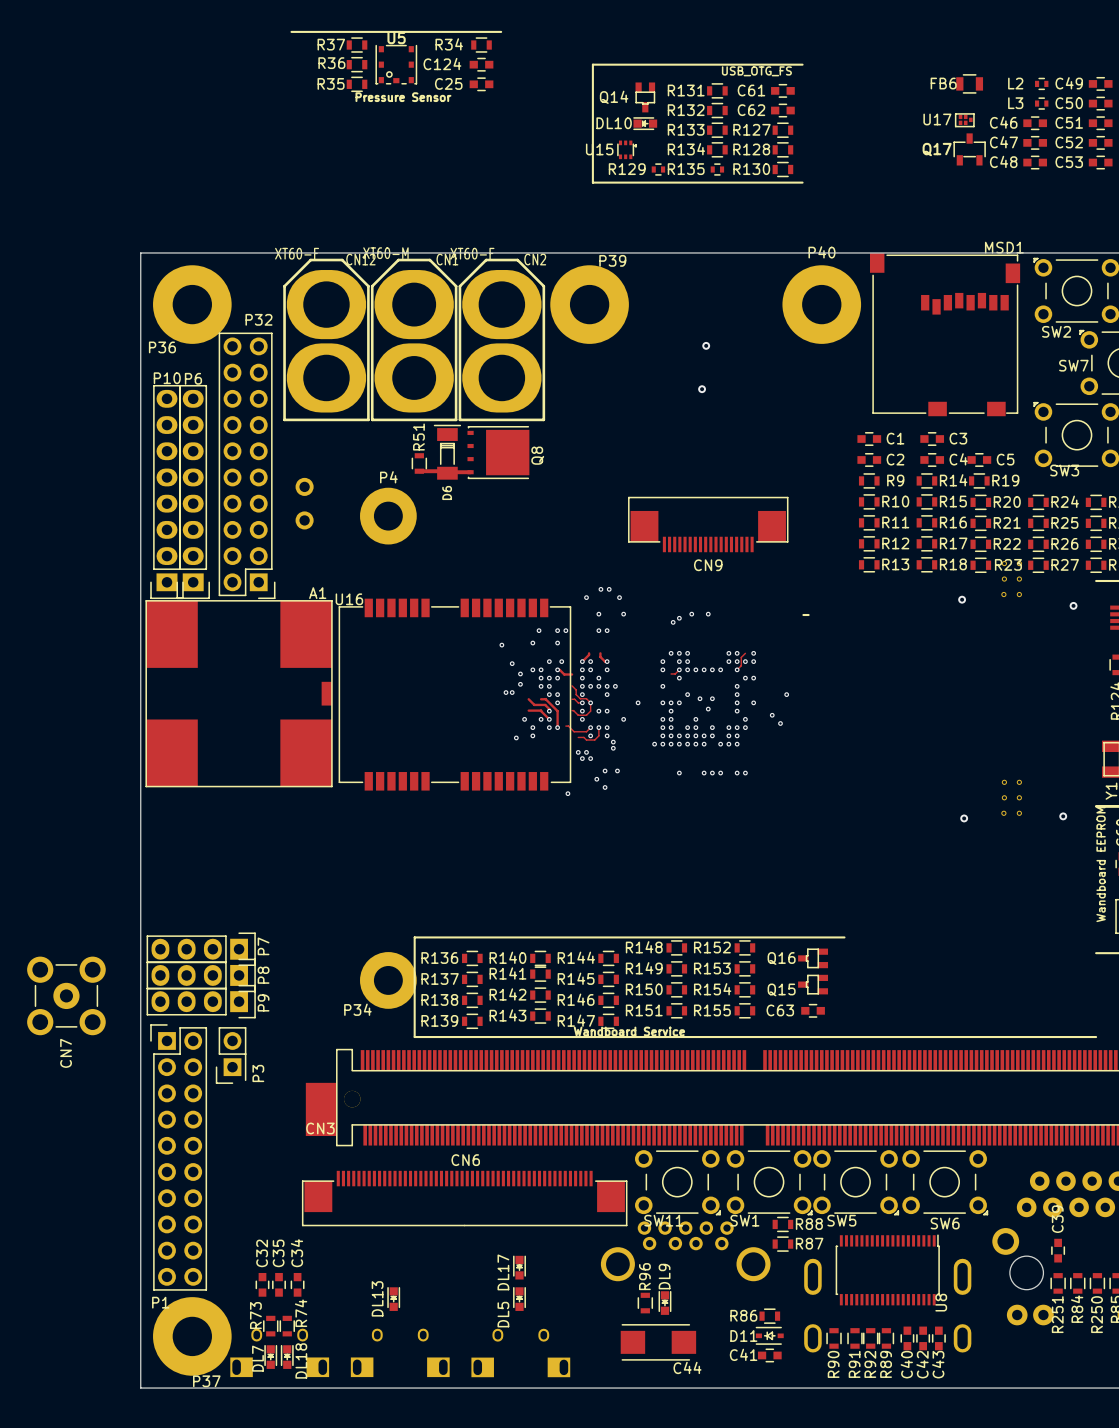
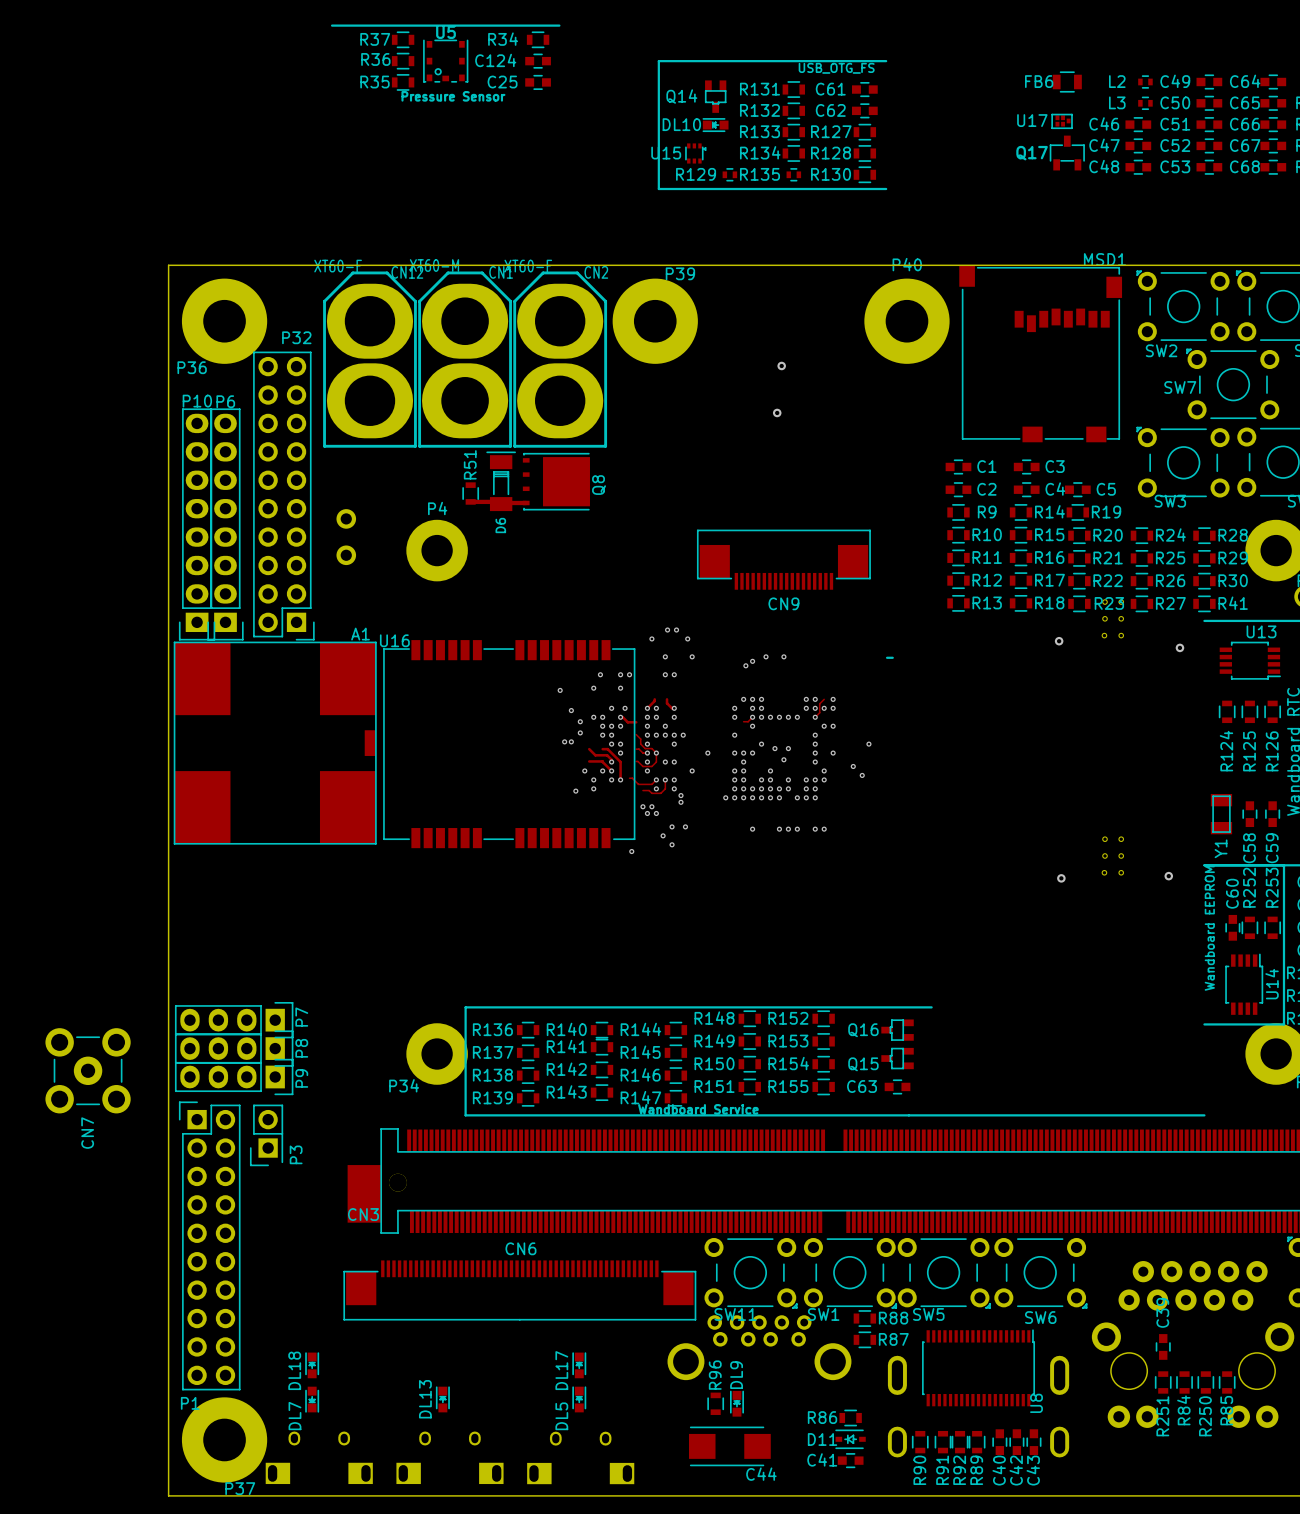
C32: (262, 1284) -> none
C35: (279, 1284) -> none
C34: (297, 1284) -> none
R73: (270, 1326) -> none
R74: (287, 1326) -> none
DL7 rotation: 0° (270, 1356) -> 180° (312, 1399)
DL7 position: (270, 1356) -> (312, 1399)
DL18 position: (287, 1356) -> (312, 1365)
DL18 name position: DL18 (301, 1360) -> DL18 (294, 1370)

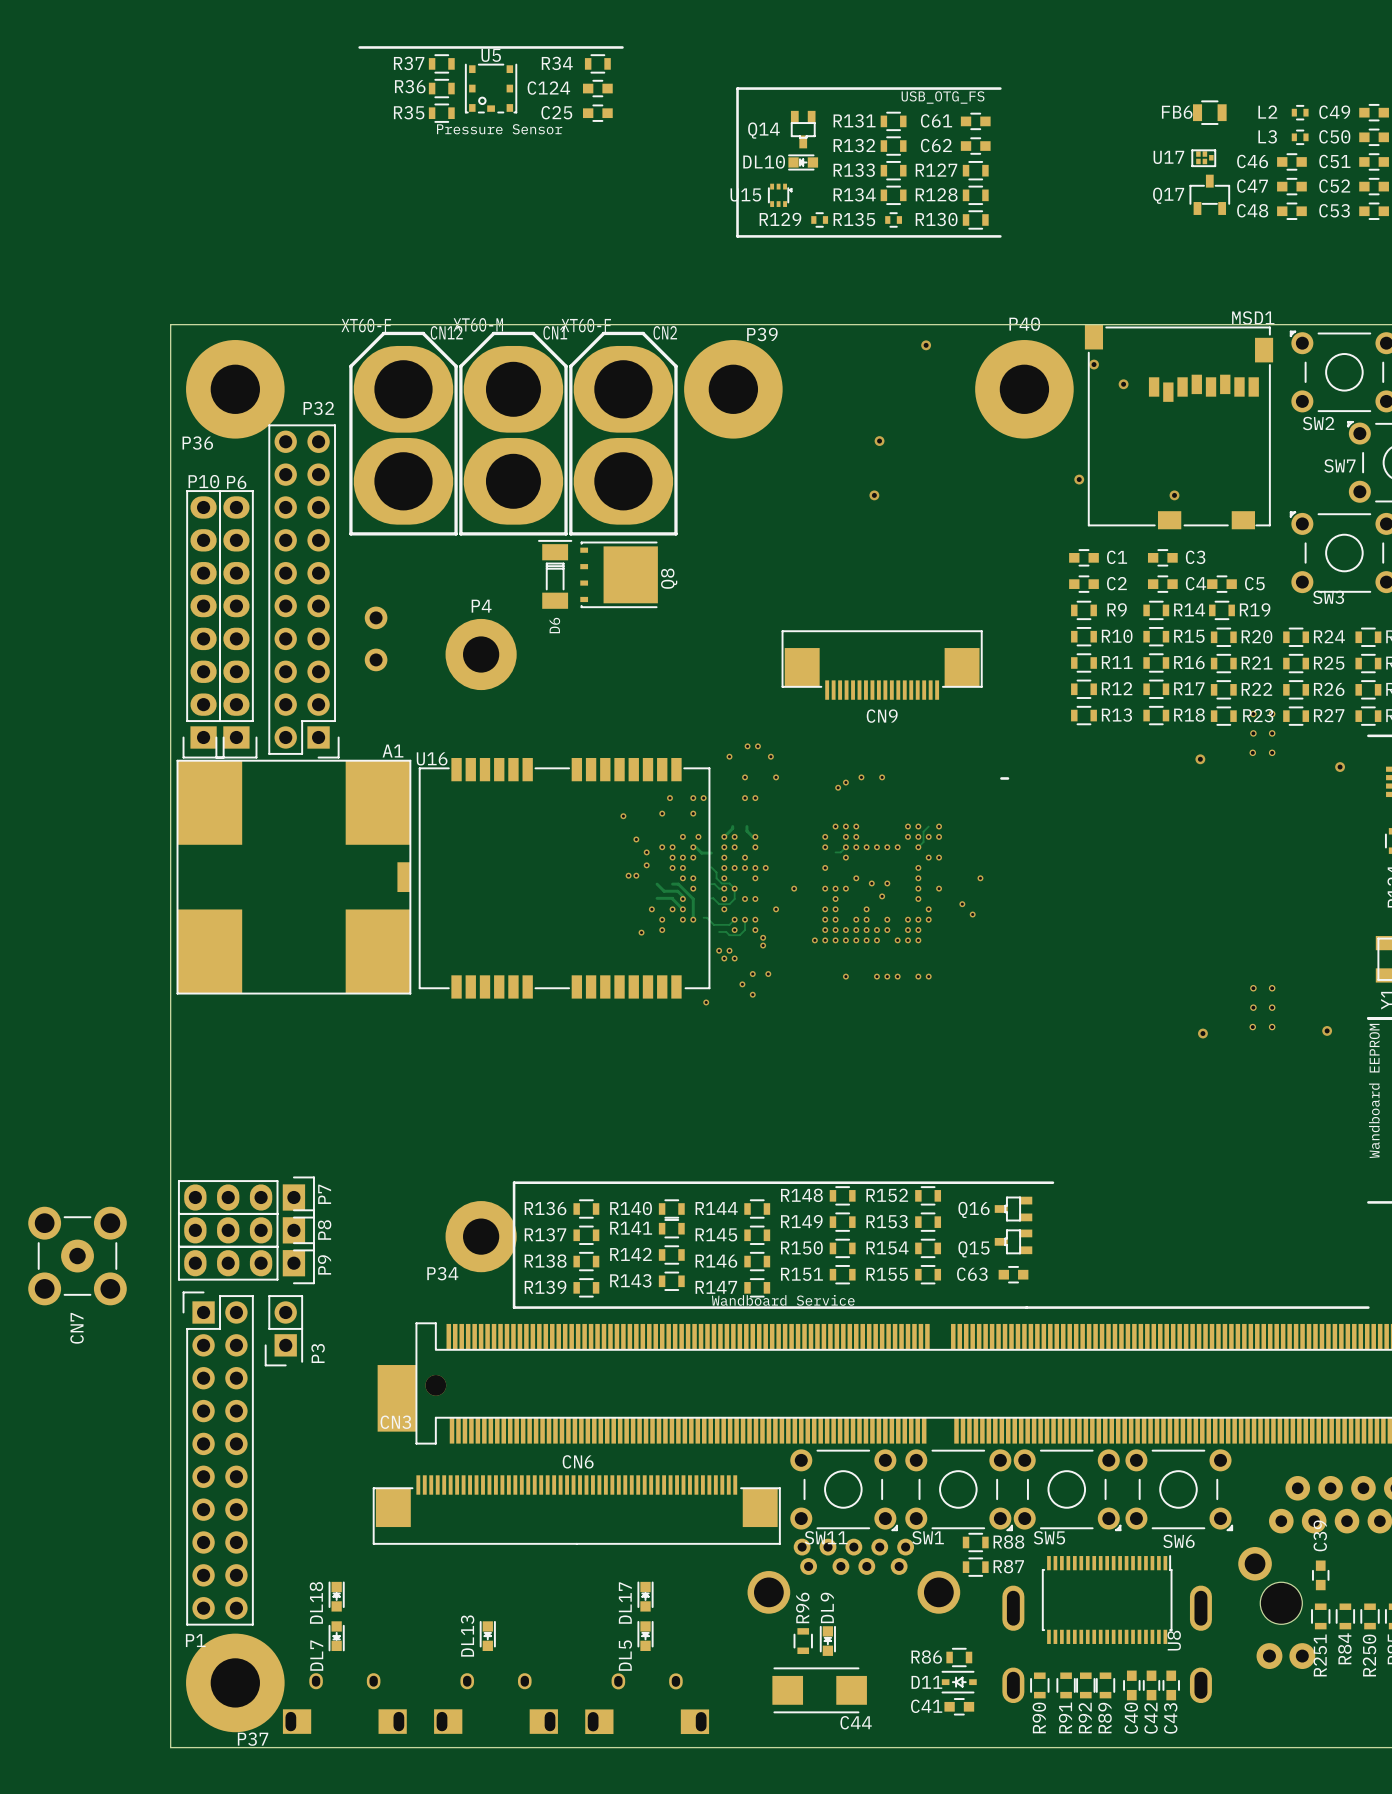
via: none -> (926, 345)
via: none -> (1094, 364)
via: none -> (1123, 384)
via: none -> (1079, 479)
via: none -> (1174, 495)
R51: (470, 493) -> none
track: (470, 501) (498, 501) (501, 504) (526, 502) -> none

